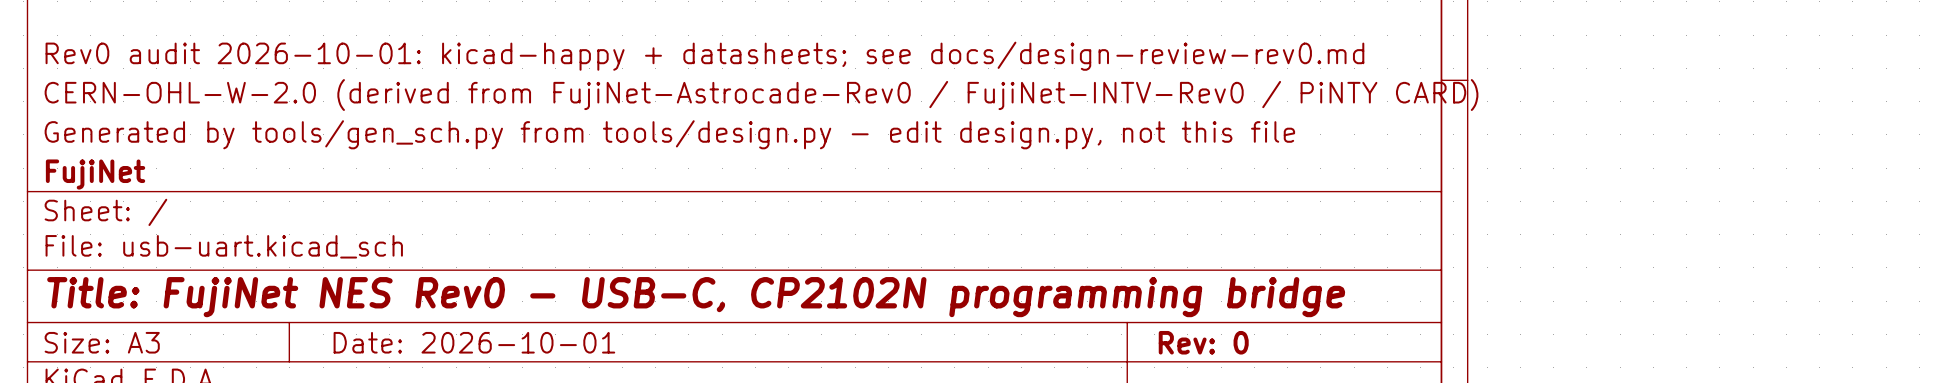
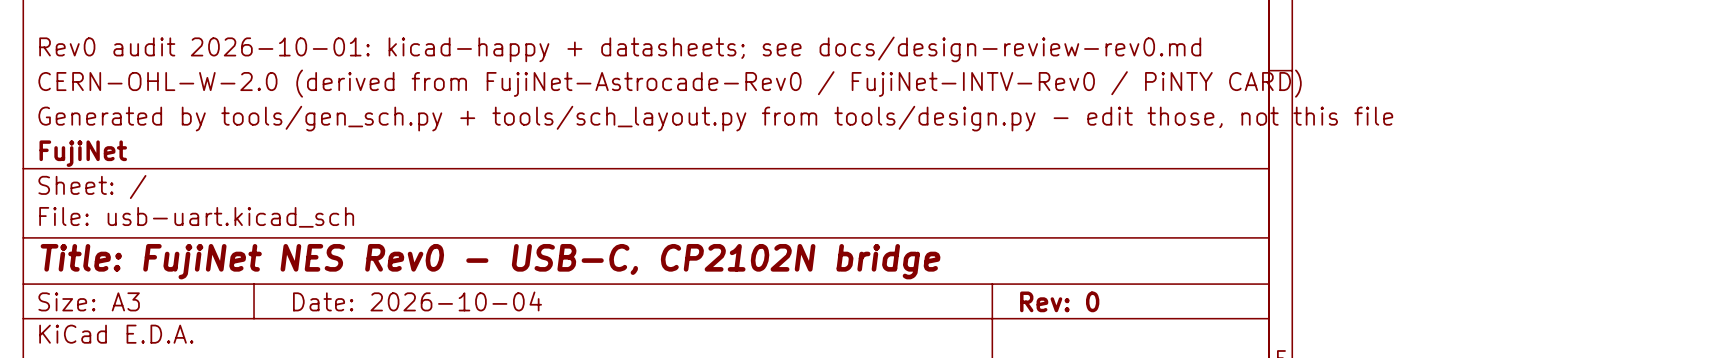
title block: Generated by tools/gen_sch.py from tools/design.py - edit design.py, not this file (669, 134) -> Generated by tools/gen_sch.py + tools/sch_layout.py from tools/design.py - edit those, not this file (715, 118)
title block: Title: FujiNet NES Rev0 - USB-C, CP2102N programming bridge (696, 297) -> Title: FujiNet NES Rev0 - USB-C, CP2102N bridge (490, 261)
title block: Date: 2026-10-01 (474, 342) -> Date: 2026-10-04 (417, 301)

